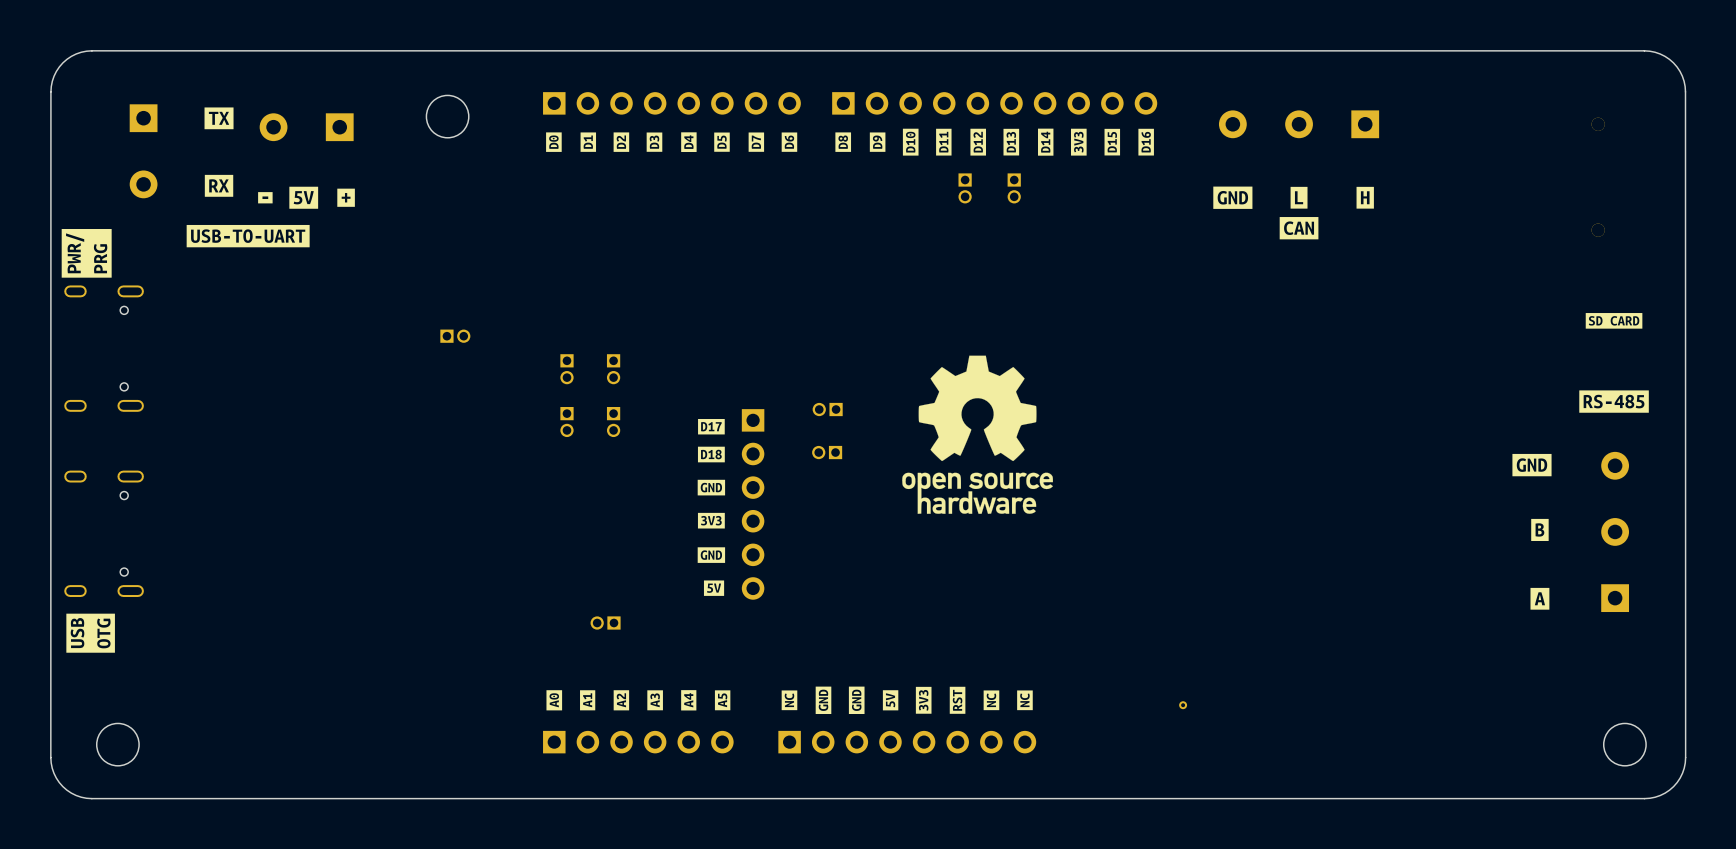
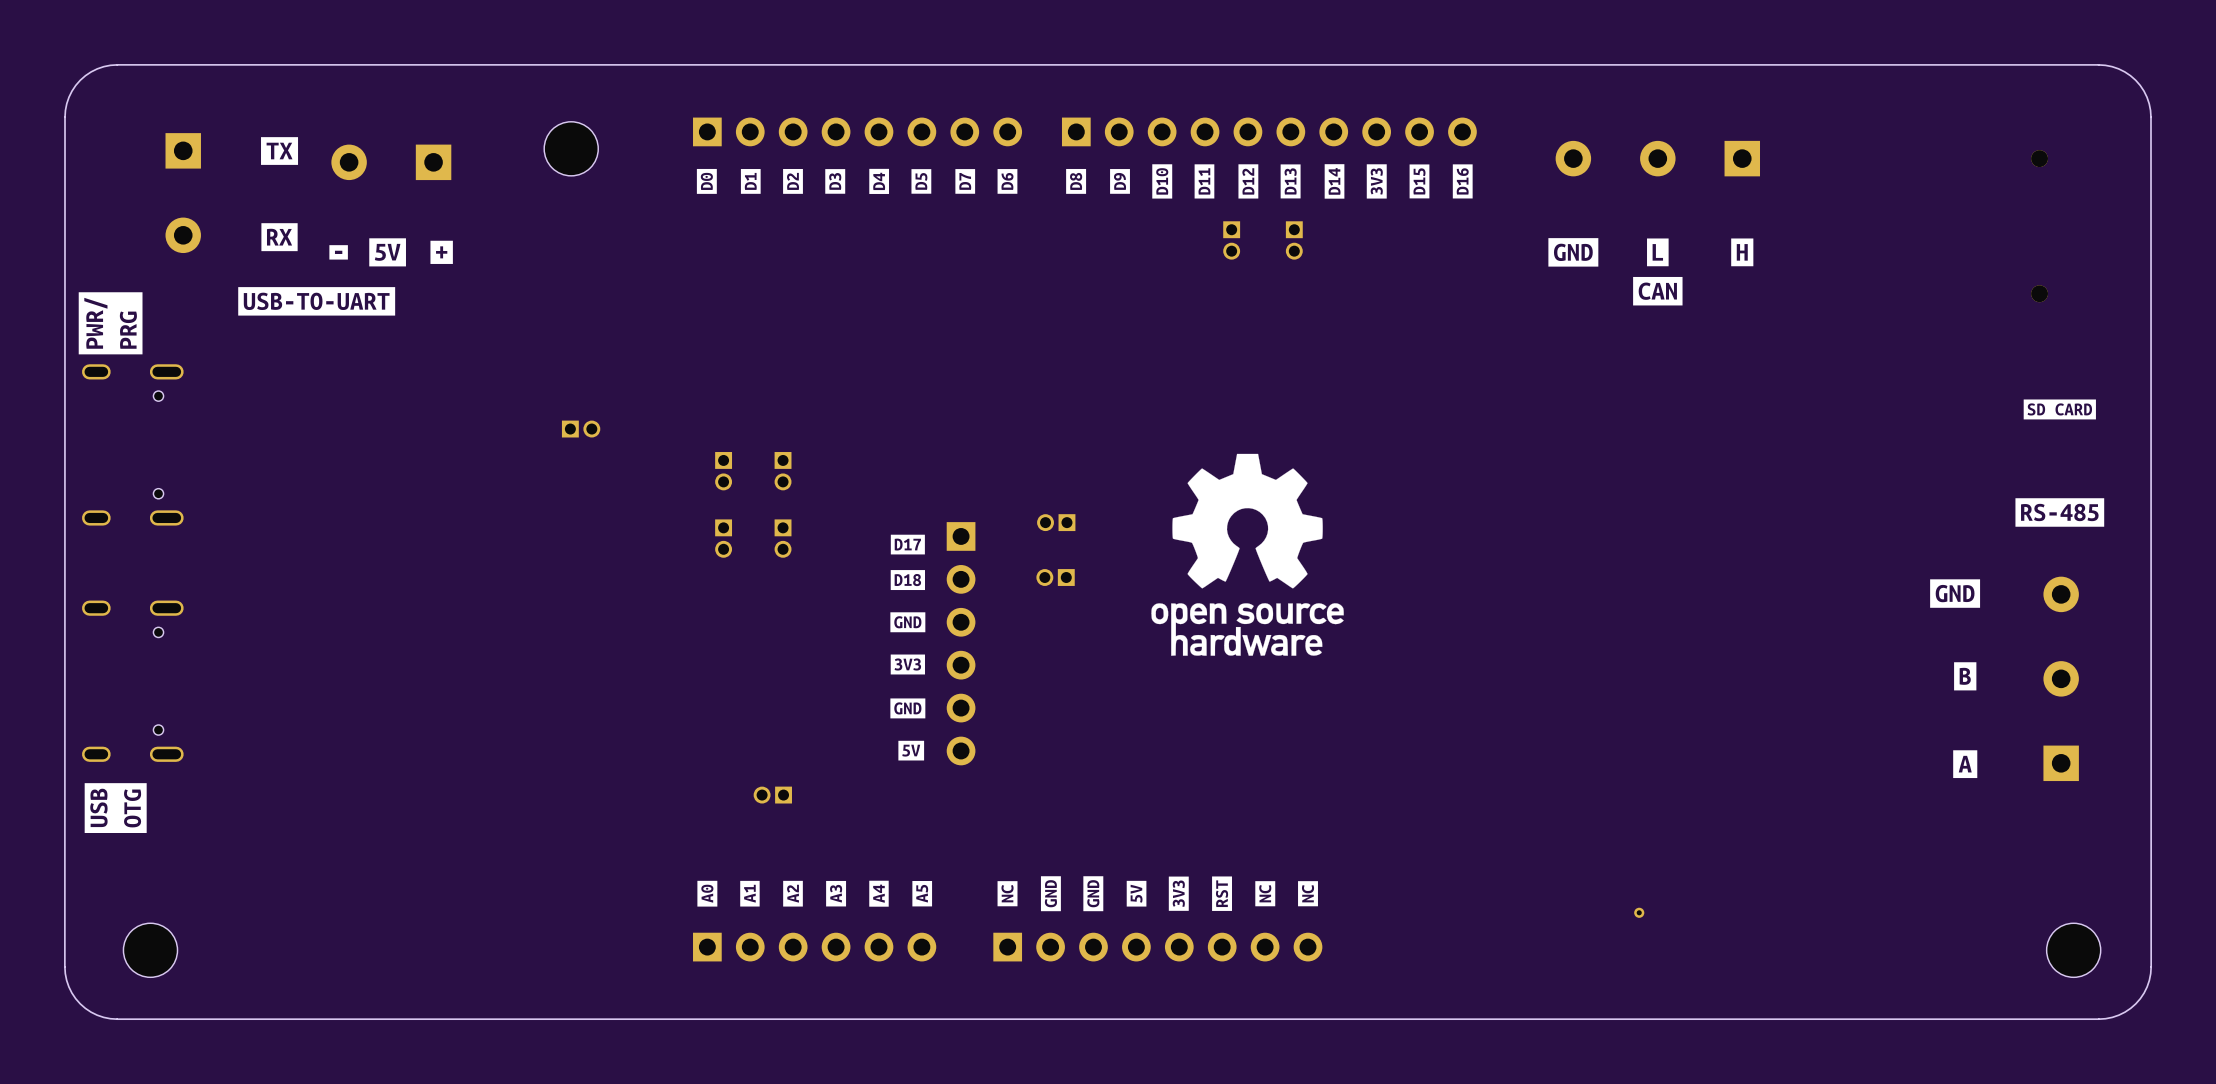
part position: (1183, 705) -> (1639, 912)

